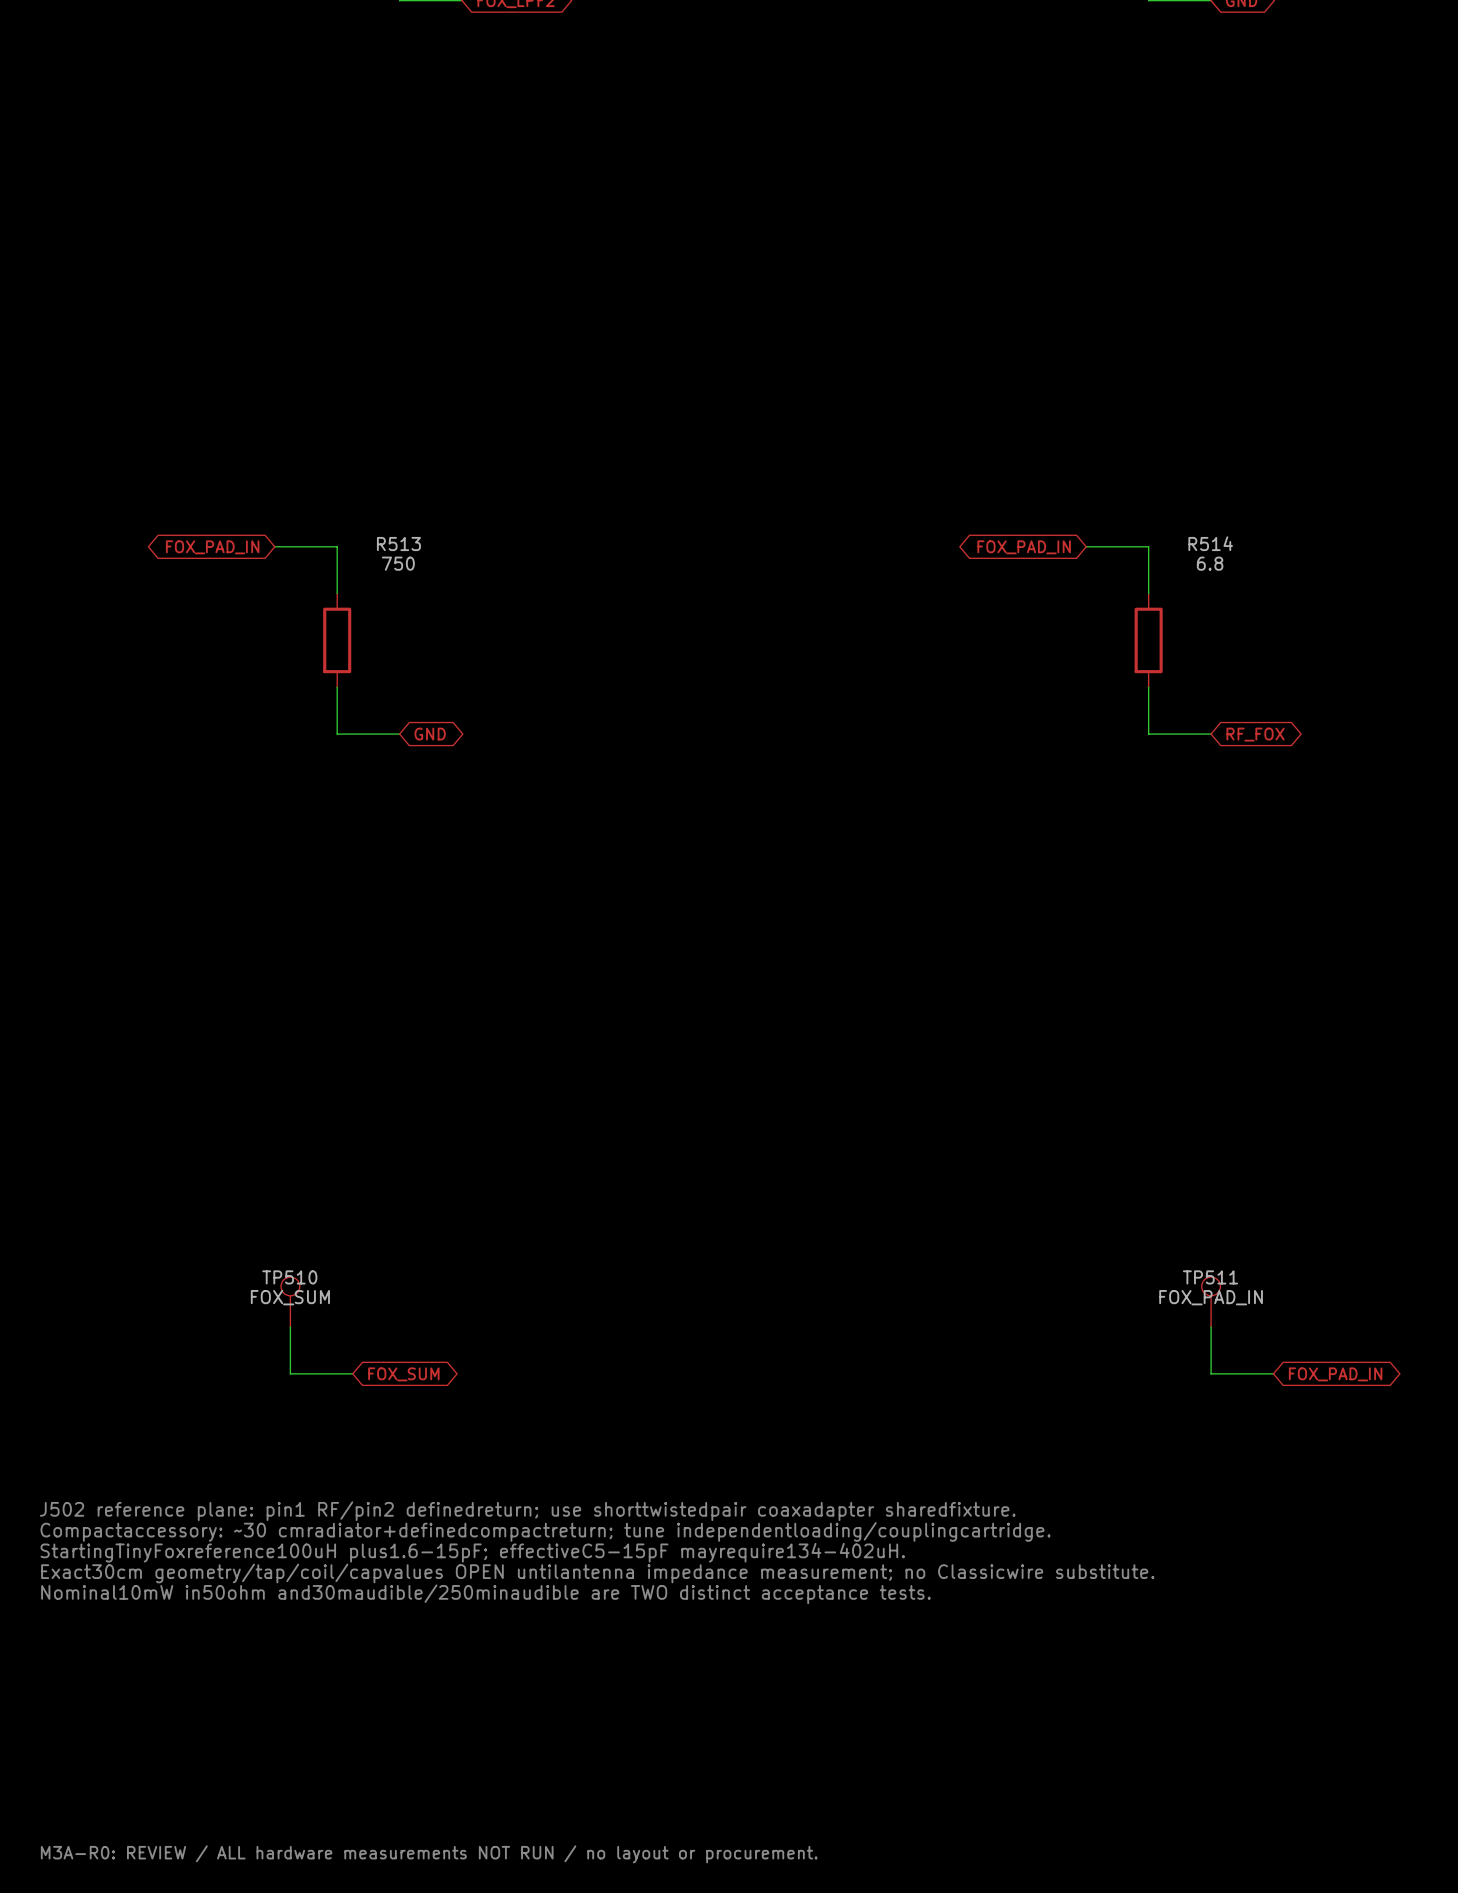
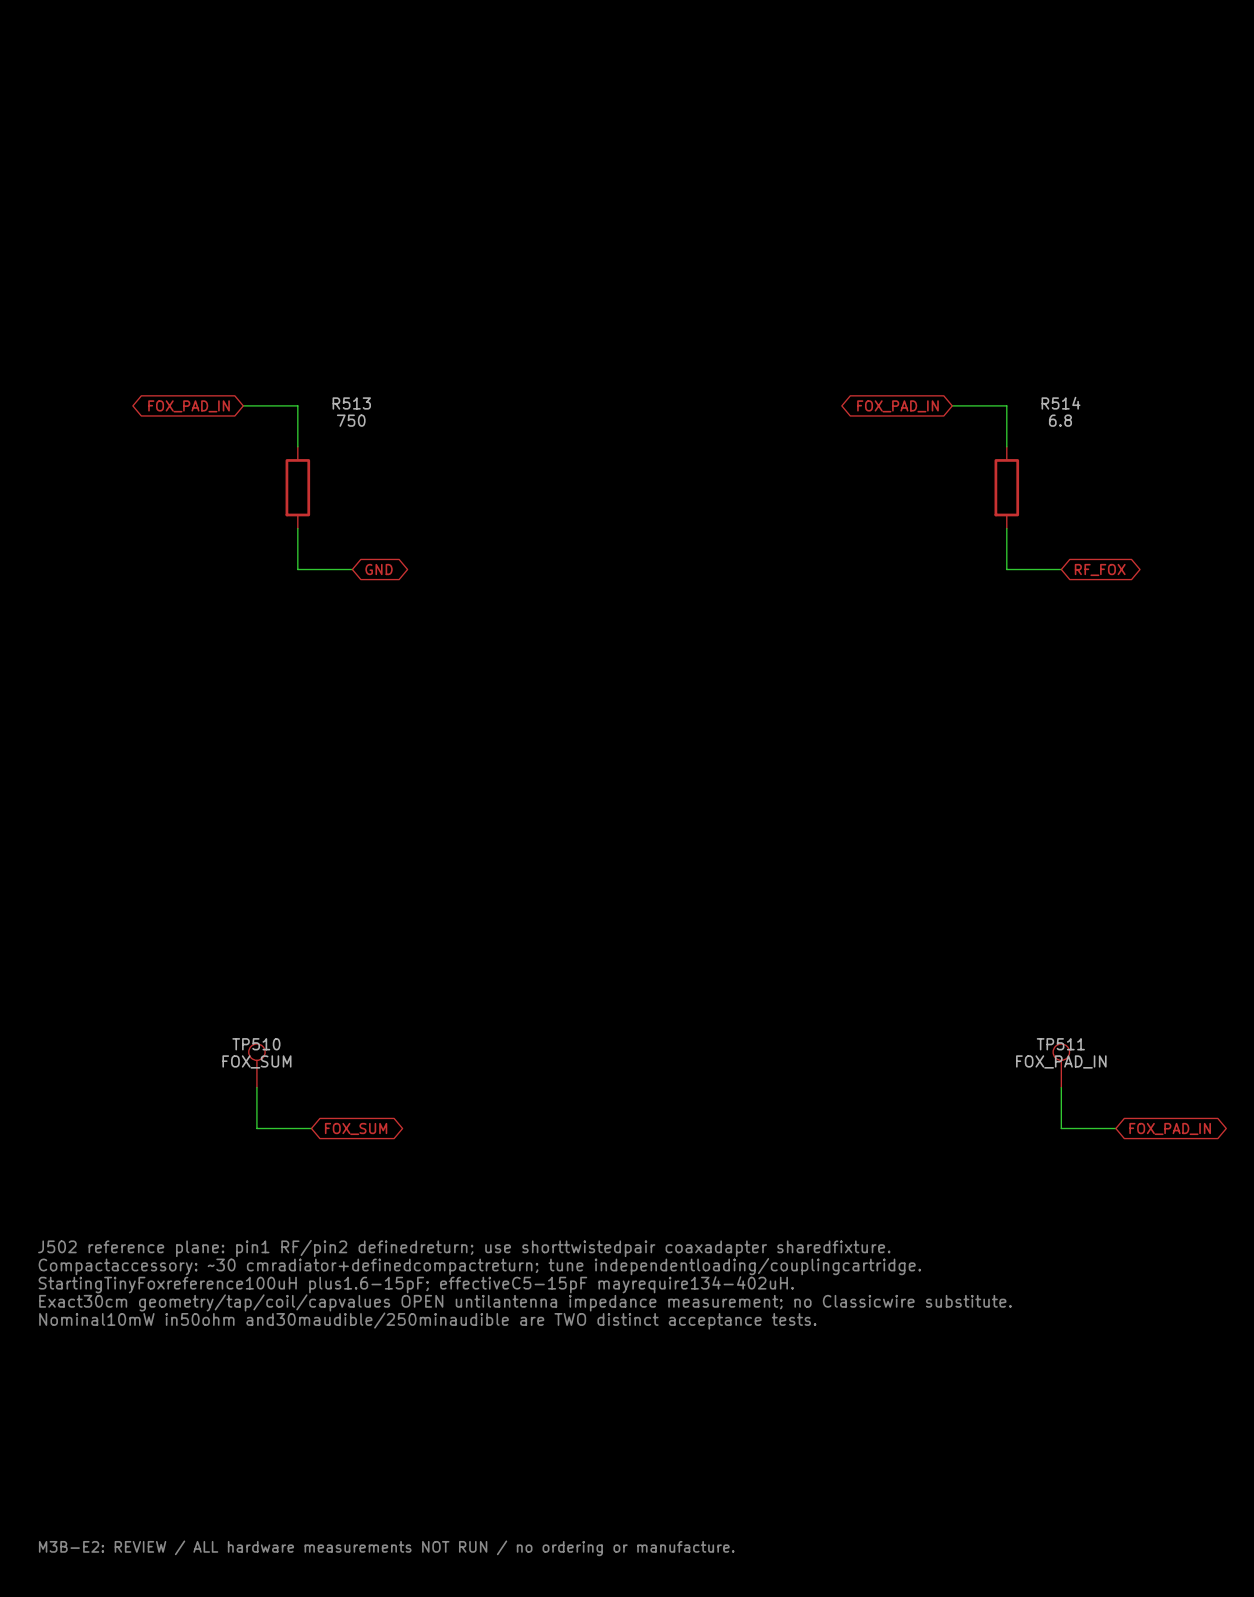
text: M3A-R0: REVIEW / ALL hardware measurements NOT RUN / no layout or procurement. (429, 1854) -> M3B-E2: REVIEW / ALL hardware measurements NOT RUN / no ordering or manufacture. (386, 1548)

